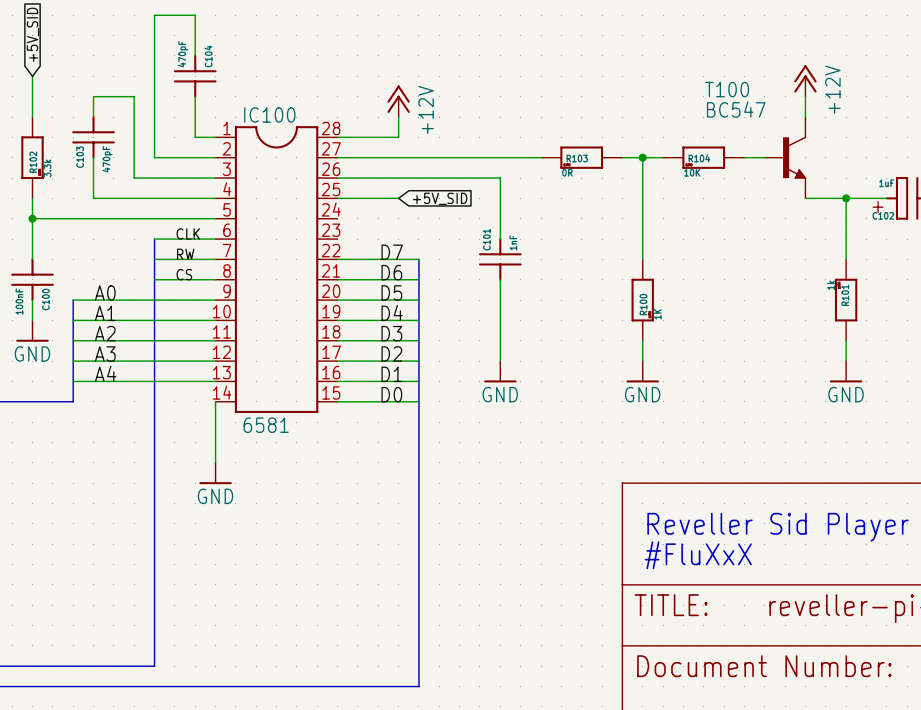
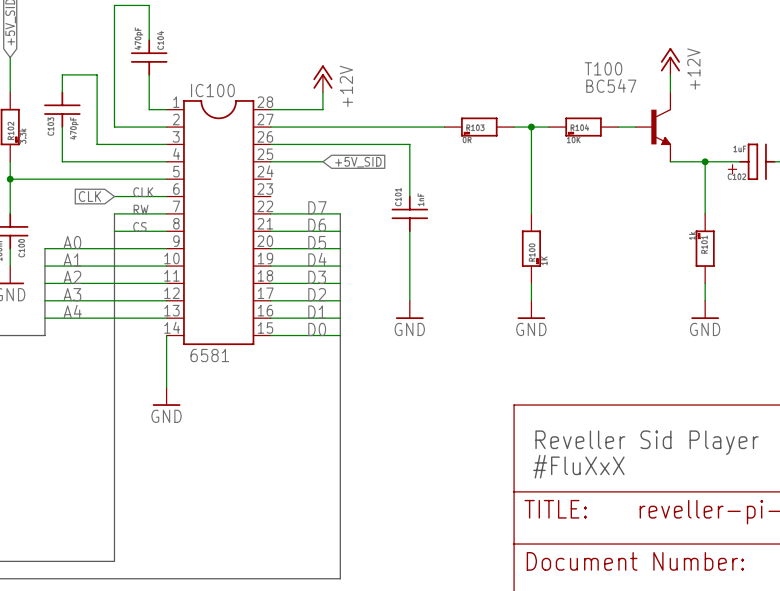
global label: none -> CLK (89, 196)
bus: (154, 239) (154, 259) -> none

